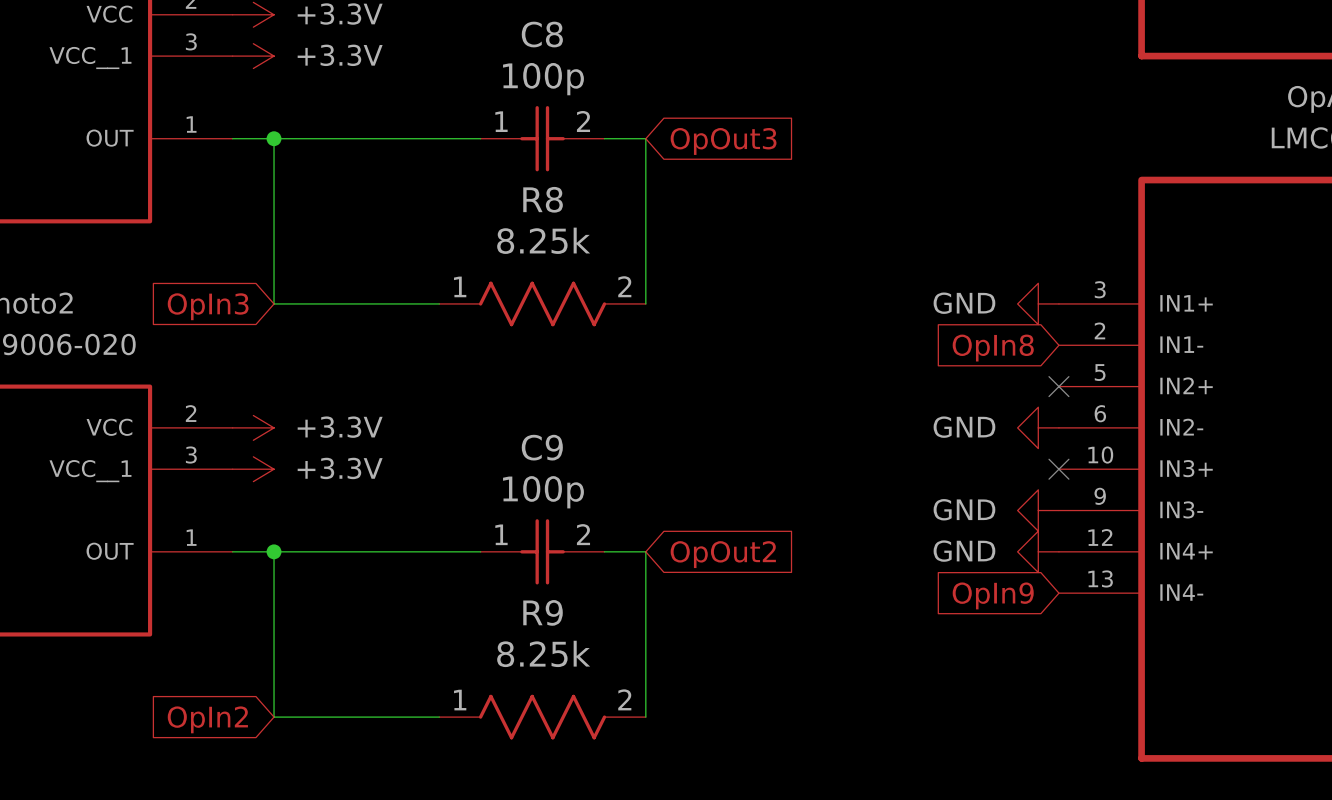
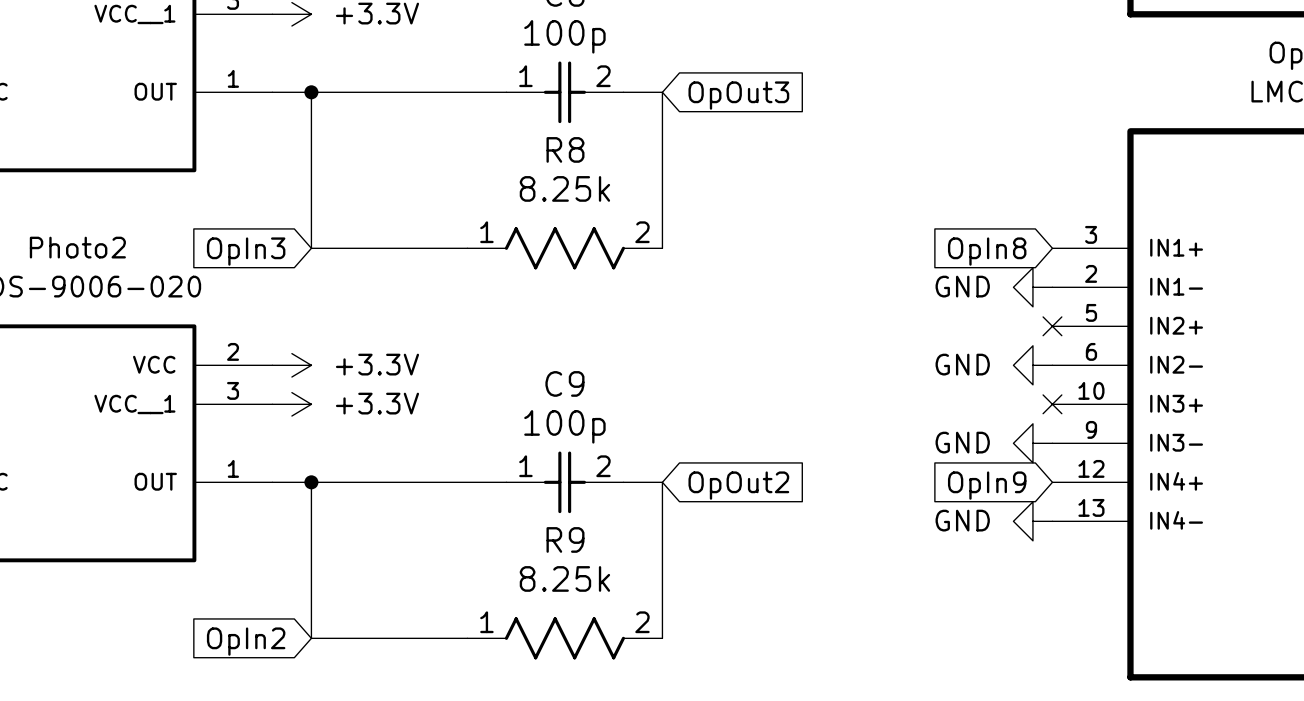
power symbol position: GND (1038, 303) -> GND (1032, 287)
global label position: OpIn8 (993, 348) -> OpIn8 (987, 251)
power symbol position: GND (1038, 551) -> GND (1032, 521)
global label position: OpIn9 (993, 595) -> OpIn9 (987, 485)

